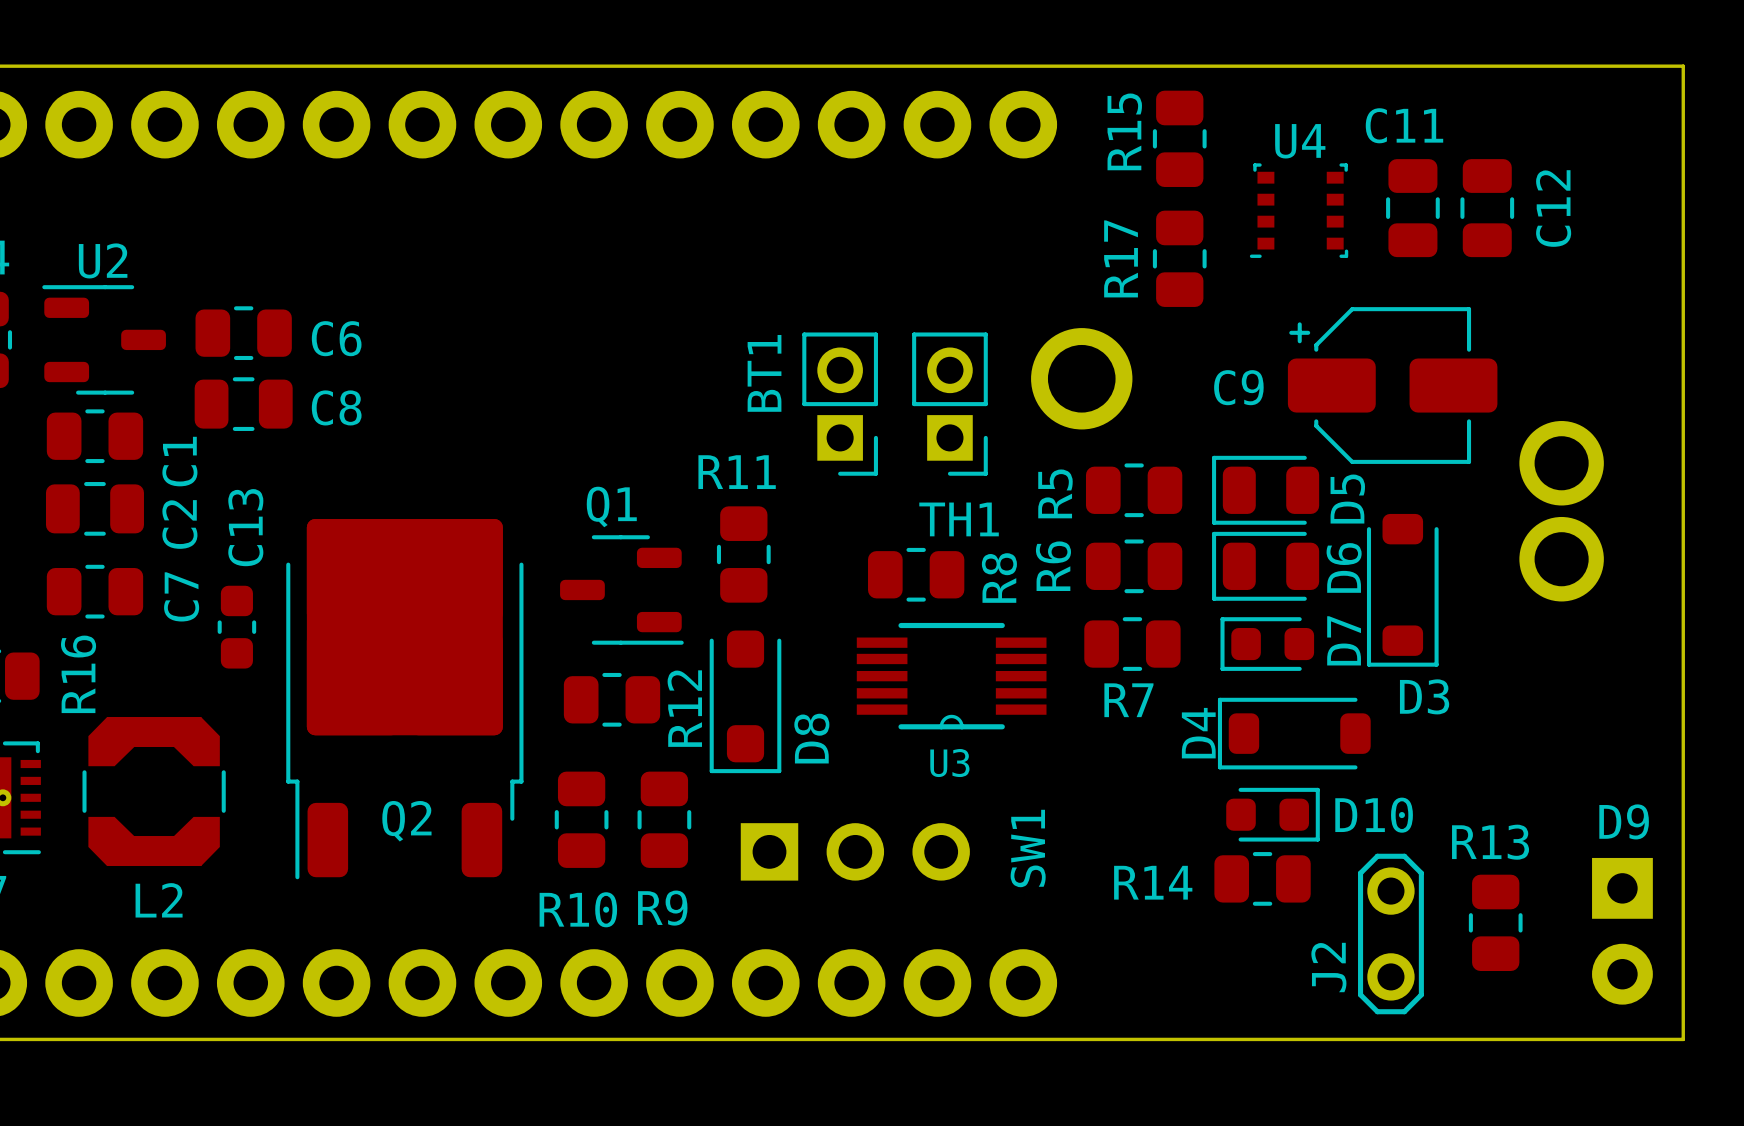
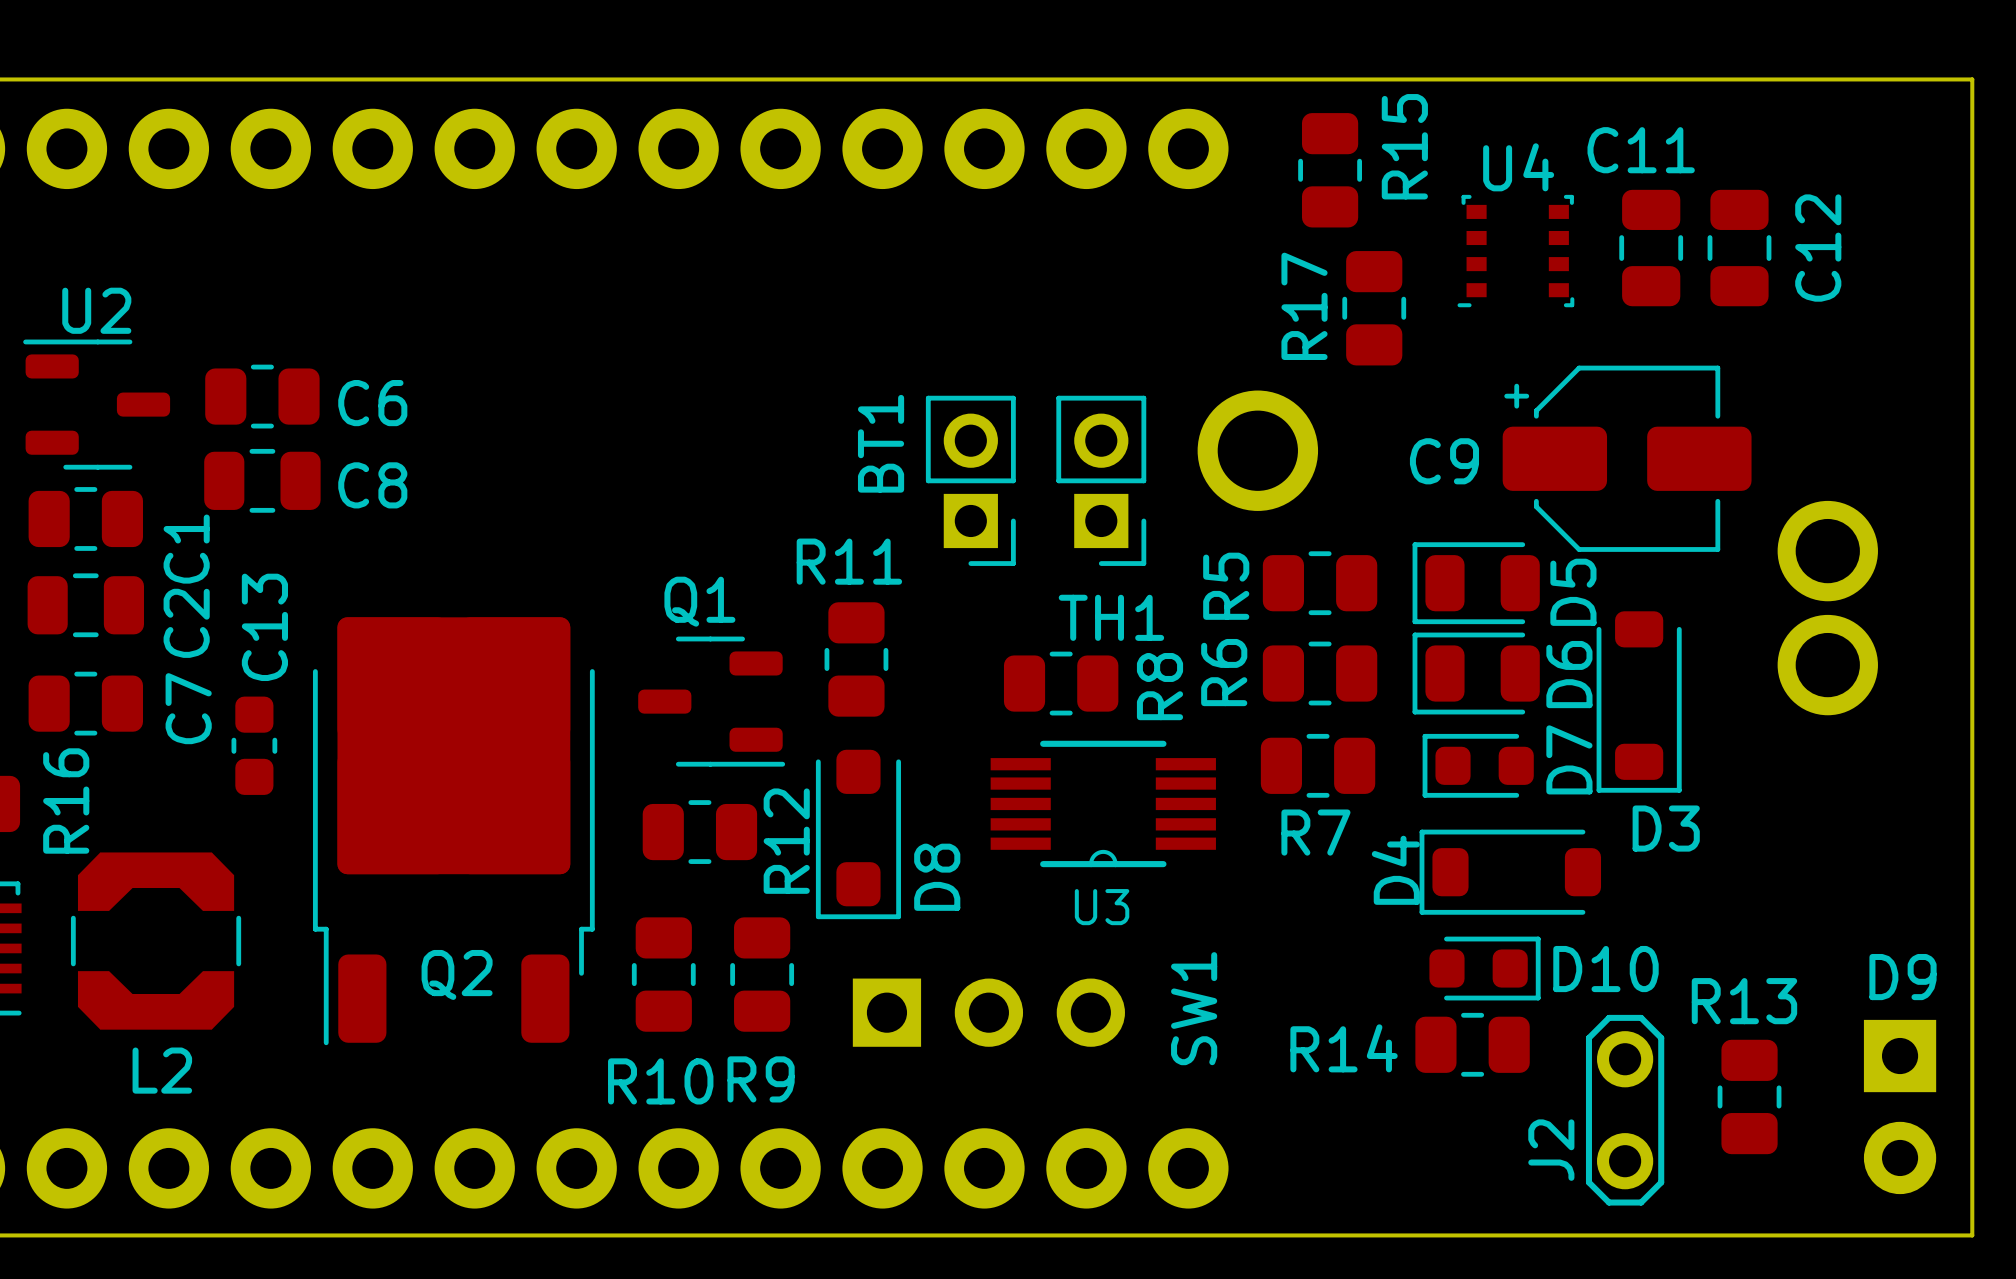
R15 name position: R15 (1124, 131) -> R15 (1404, 146)
R15 position: (1179, 138) -> (1330, 170)

